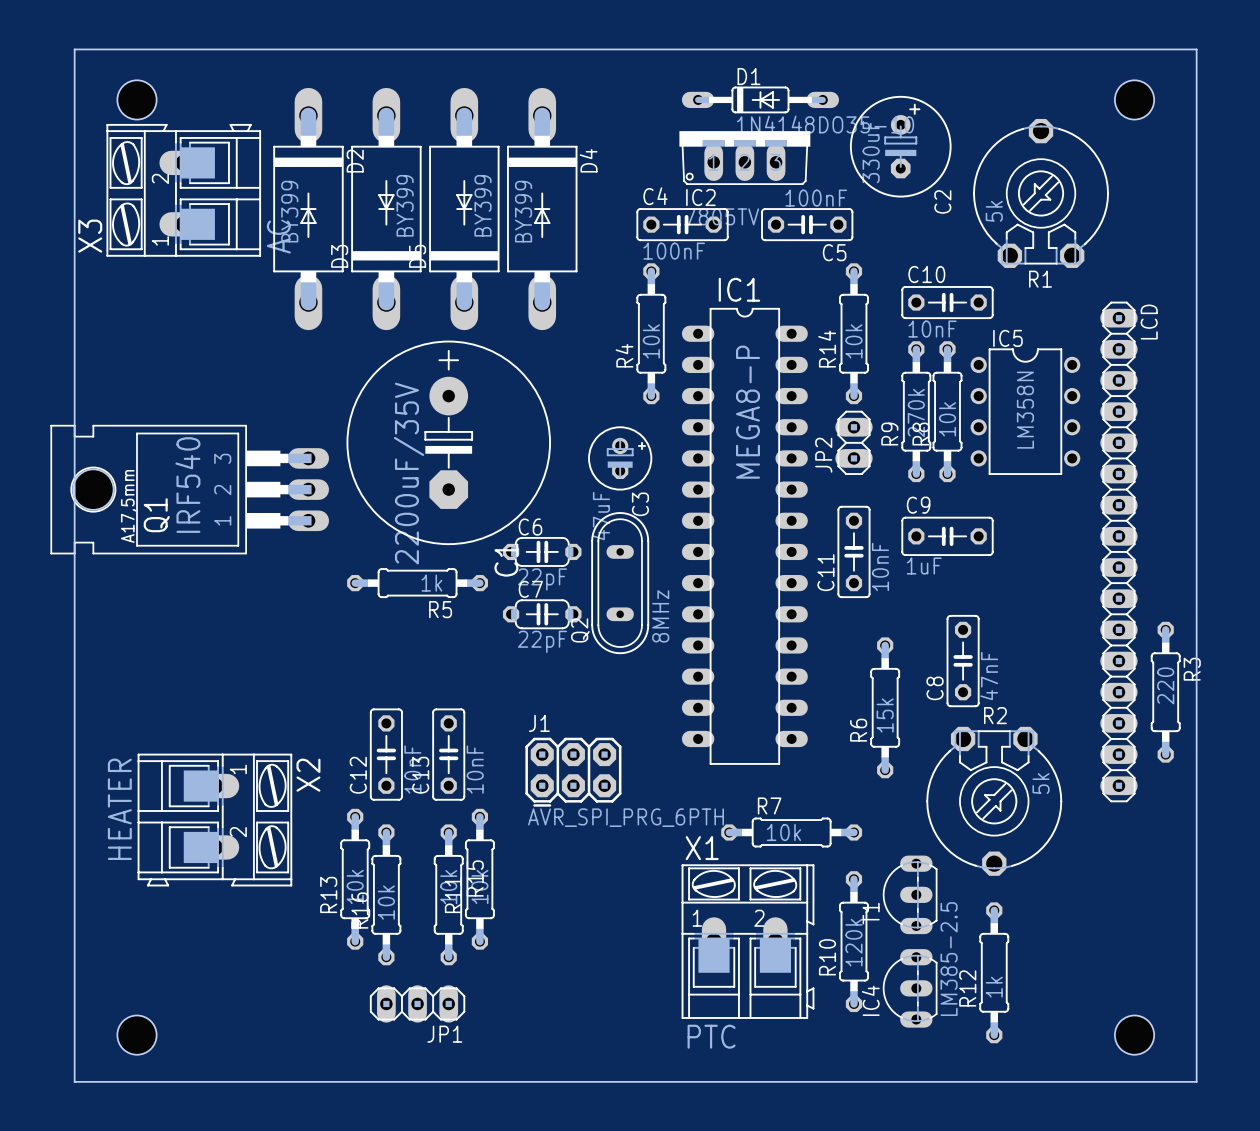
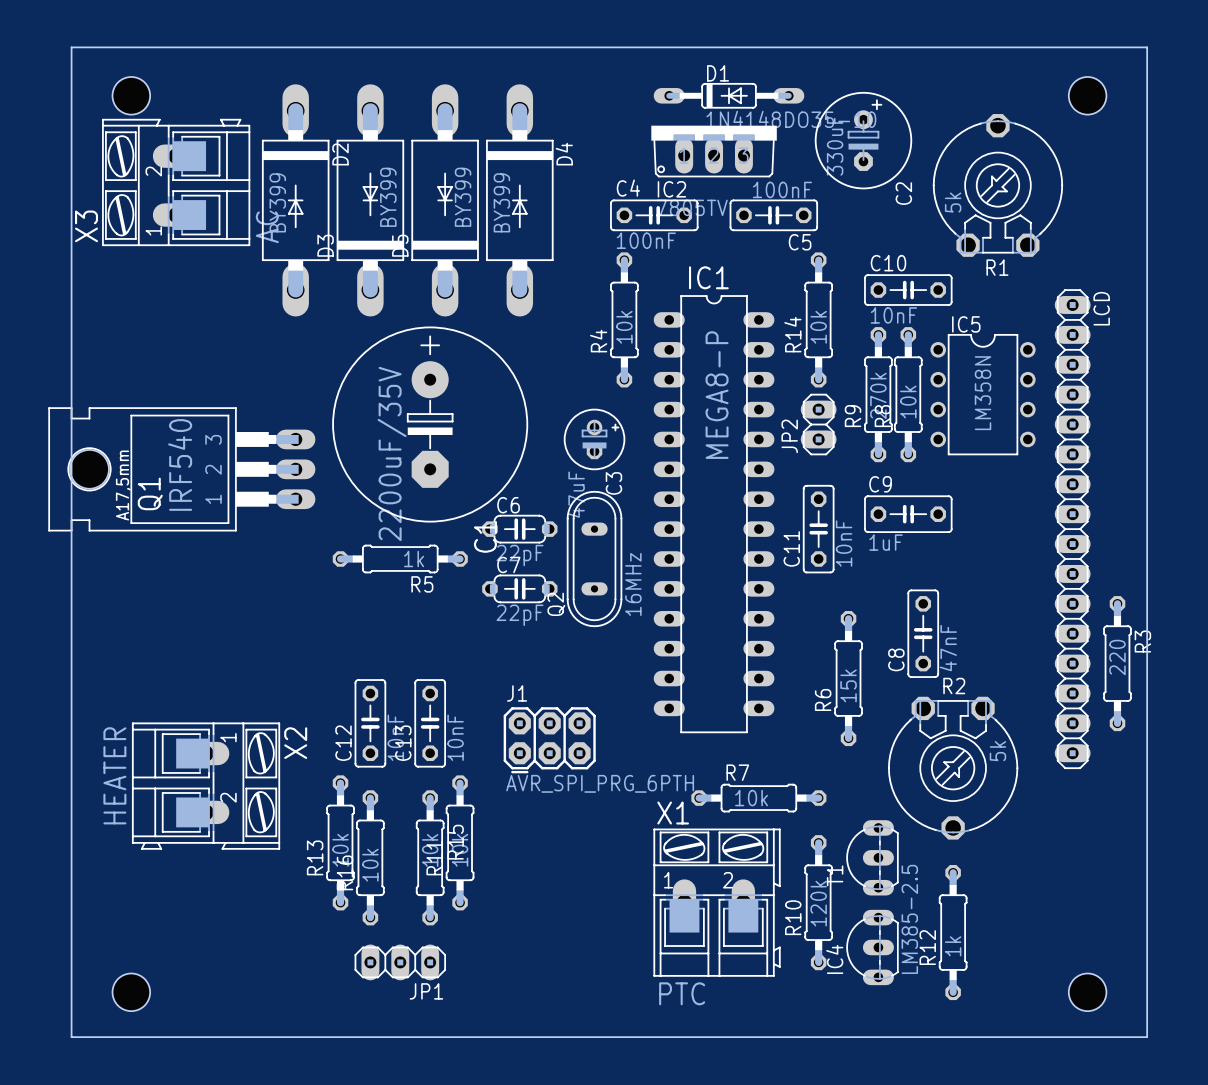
Q2 value: 8MHz (660, 616) -> 16MHz (633, 584)

